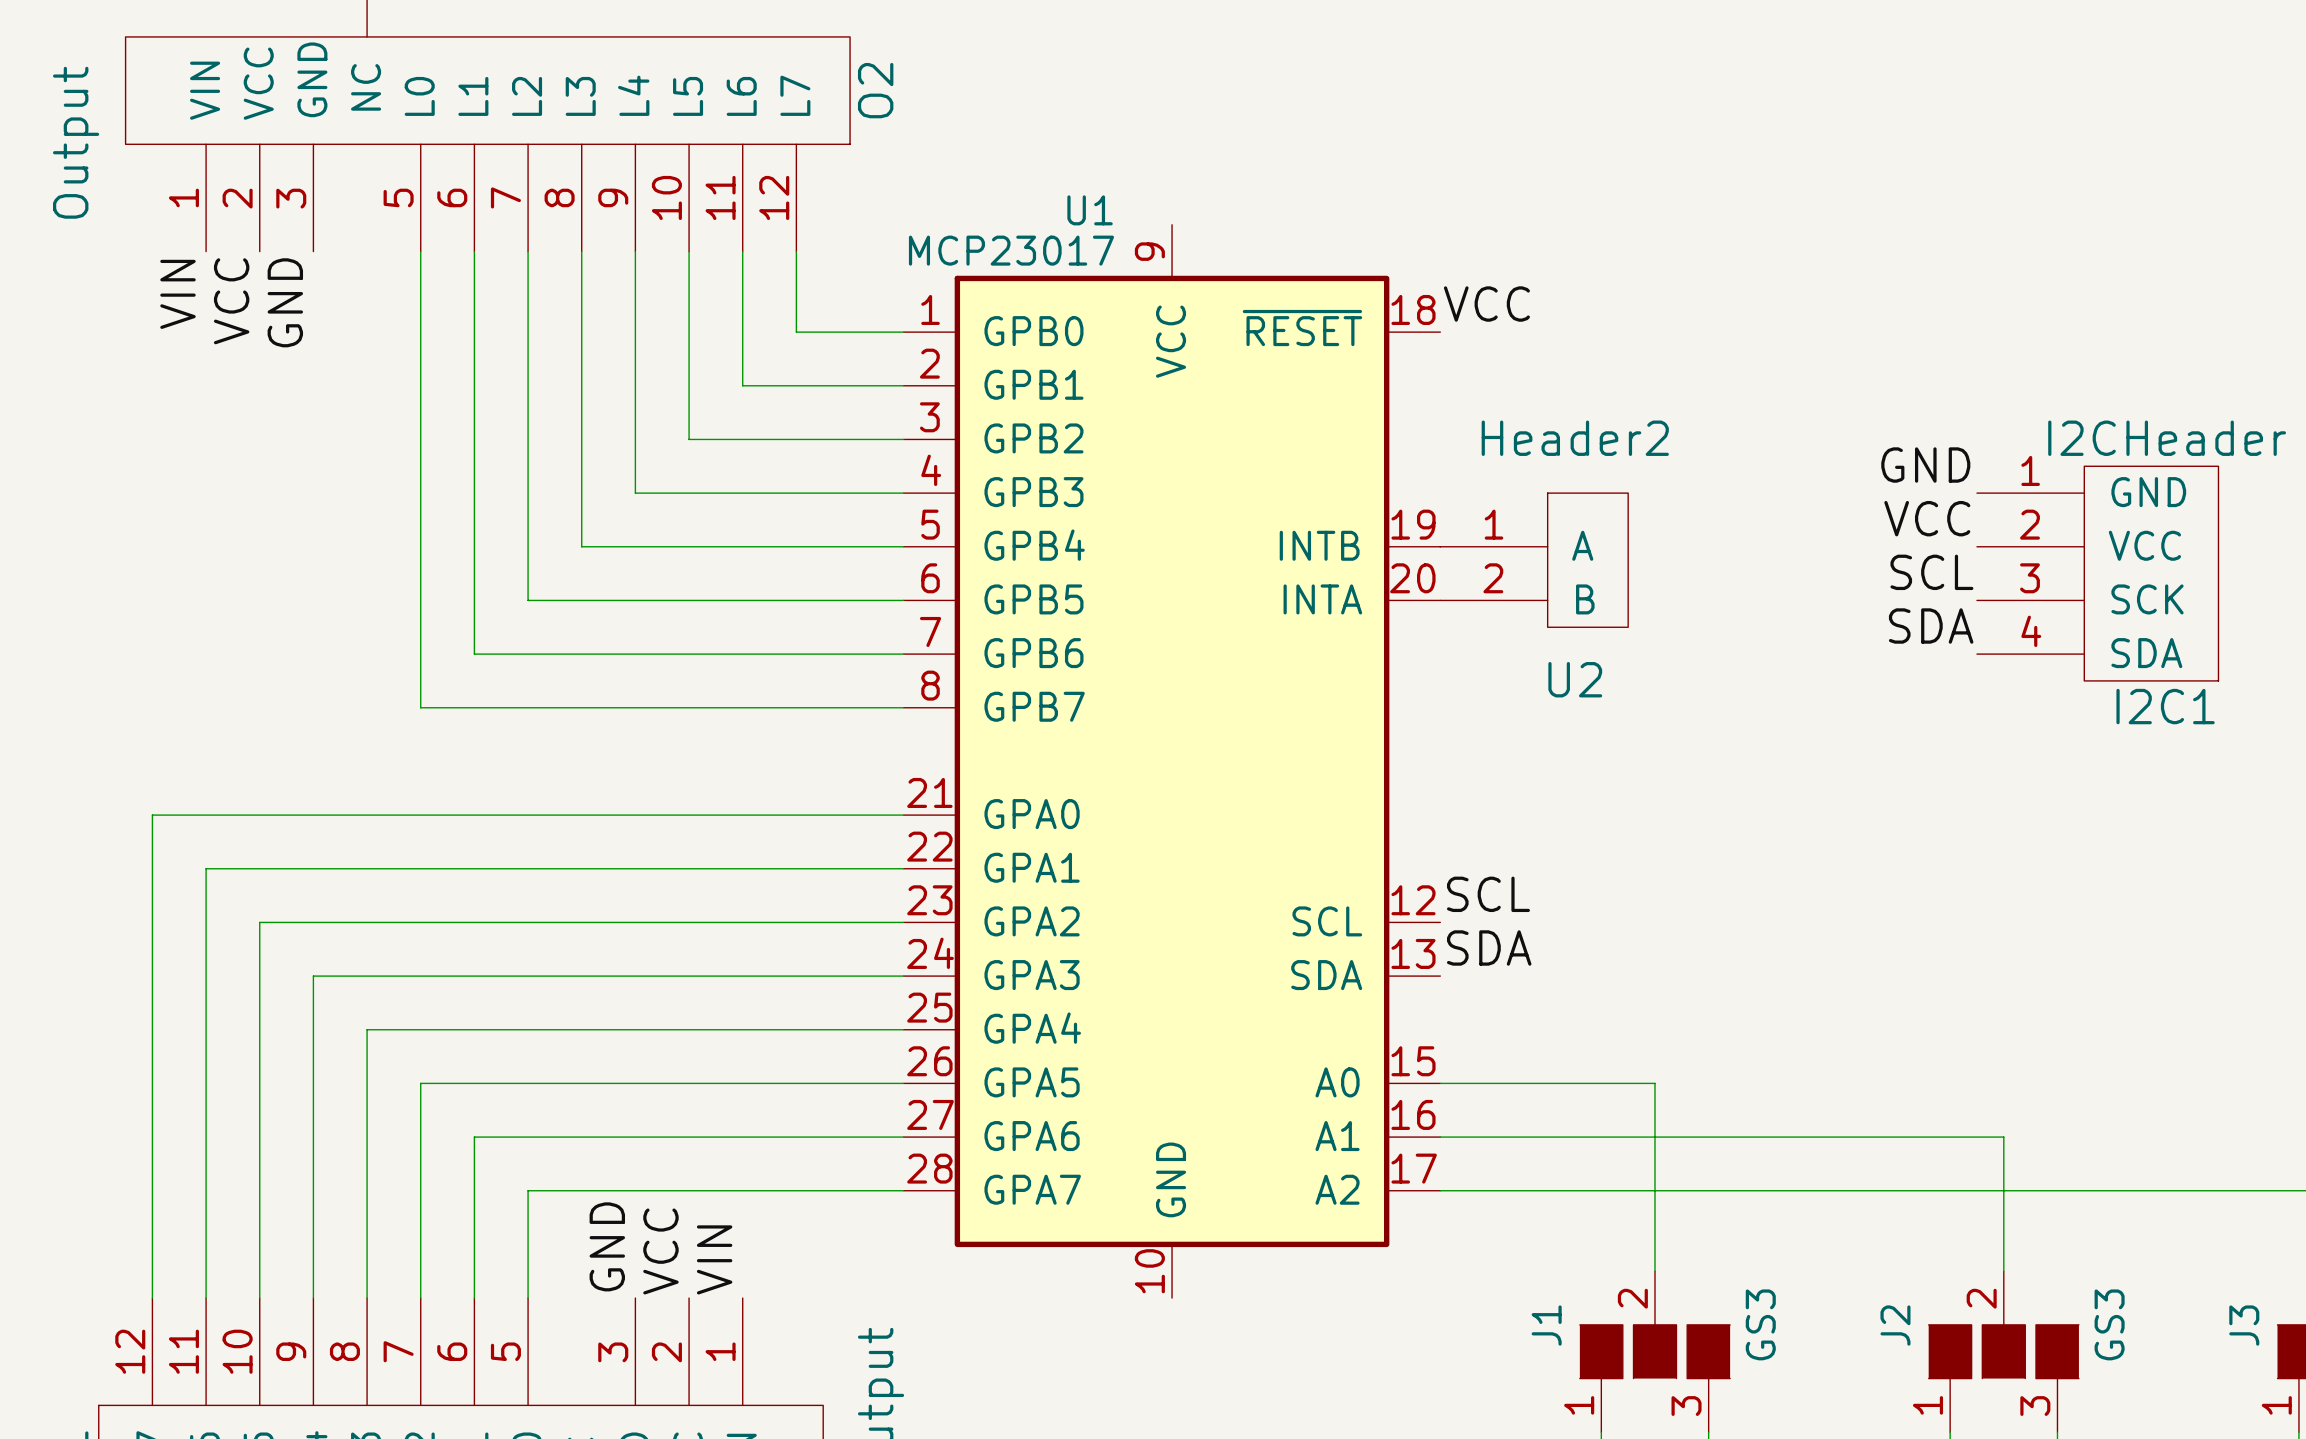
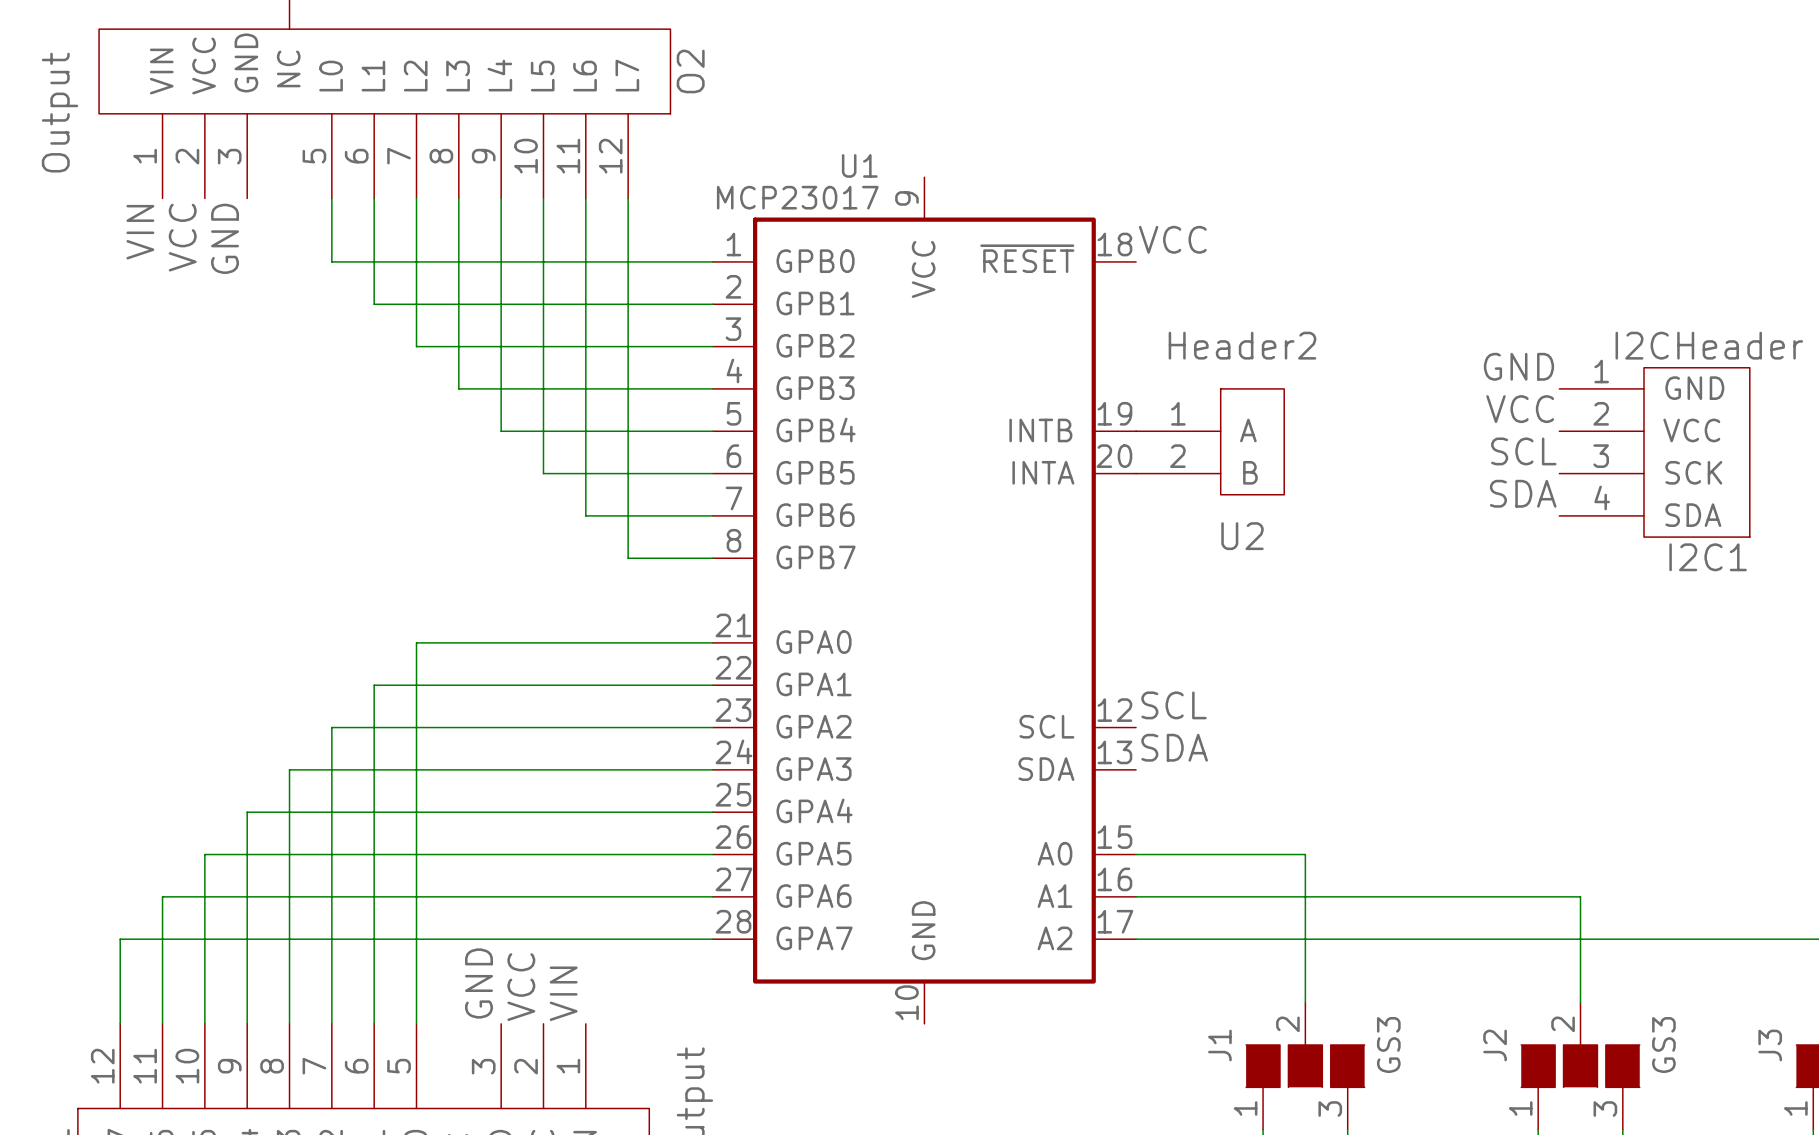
wire: (420, 332) (420, 707) (796, 707) -> (331, 261) (628, 261) (628, 558)
wire: (474, 385) (474, 654) (742, 654) -> (374, 304) (585, 304) (585, 515)
wire: (528, 439) (528, 600) (689, 600) -> (416, 346) (543, 346) (543, 473)
wire: (581, 493) (581, 546) (635, 546) -> (458, 388) (501, 388) (501, 431)
wire: (528, 815) (152, 815) (152, 1190) -> (416, 642) (416, 939) (120, 939)
wire: (474, 868) (206, 868) (206, 1137) -> (374, 685) (374, 896) (162, 896)
wire: (420, 922) (259, 922) (259, 1083) -> (331, 727) (331, 854) (204, 854)
wire: (367, 976) (313, 976) (313, 1029) -> (289, 769) (289, 812) (247, 812)

